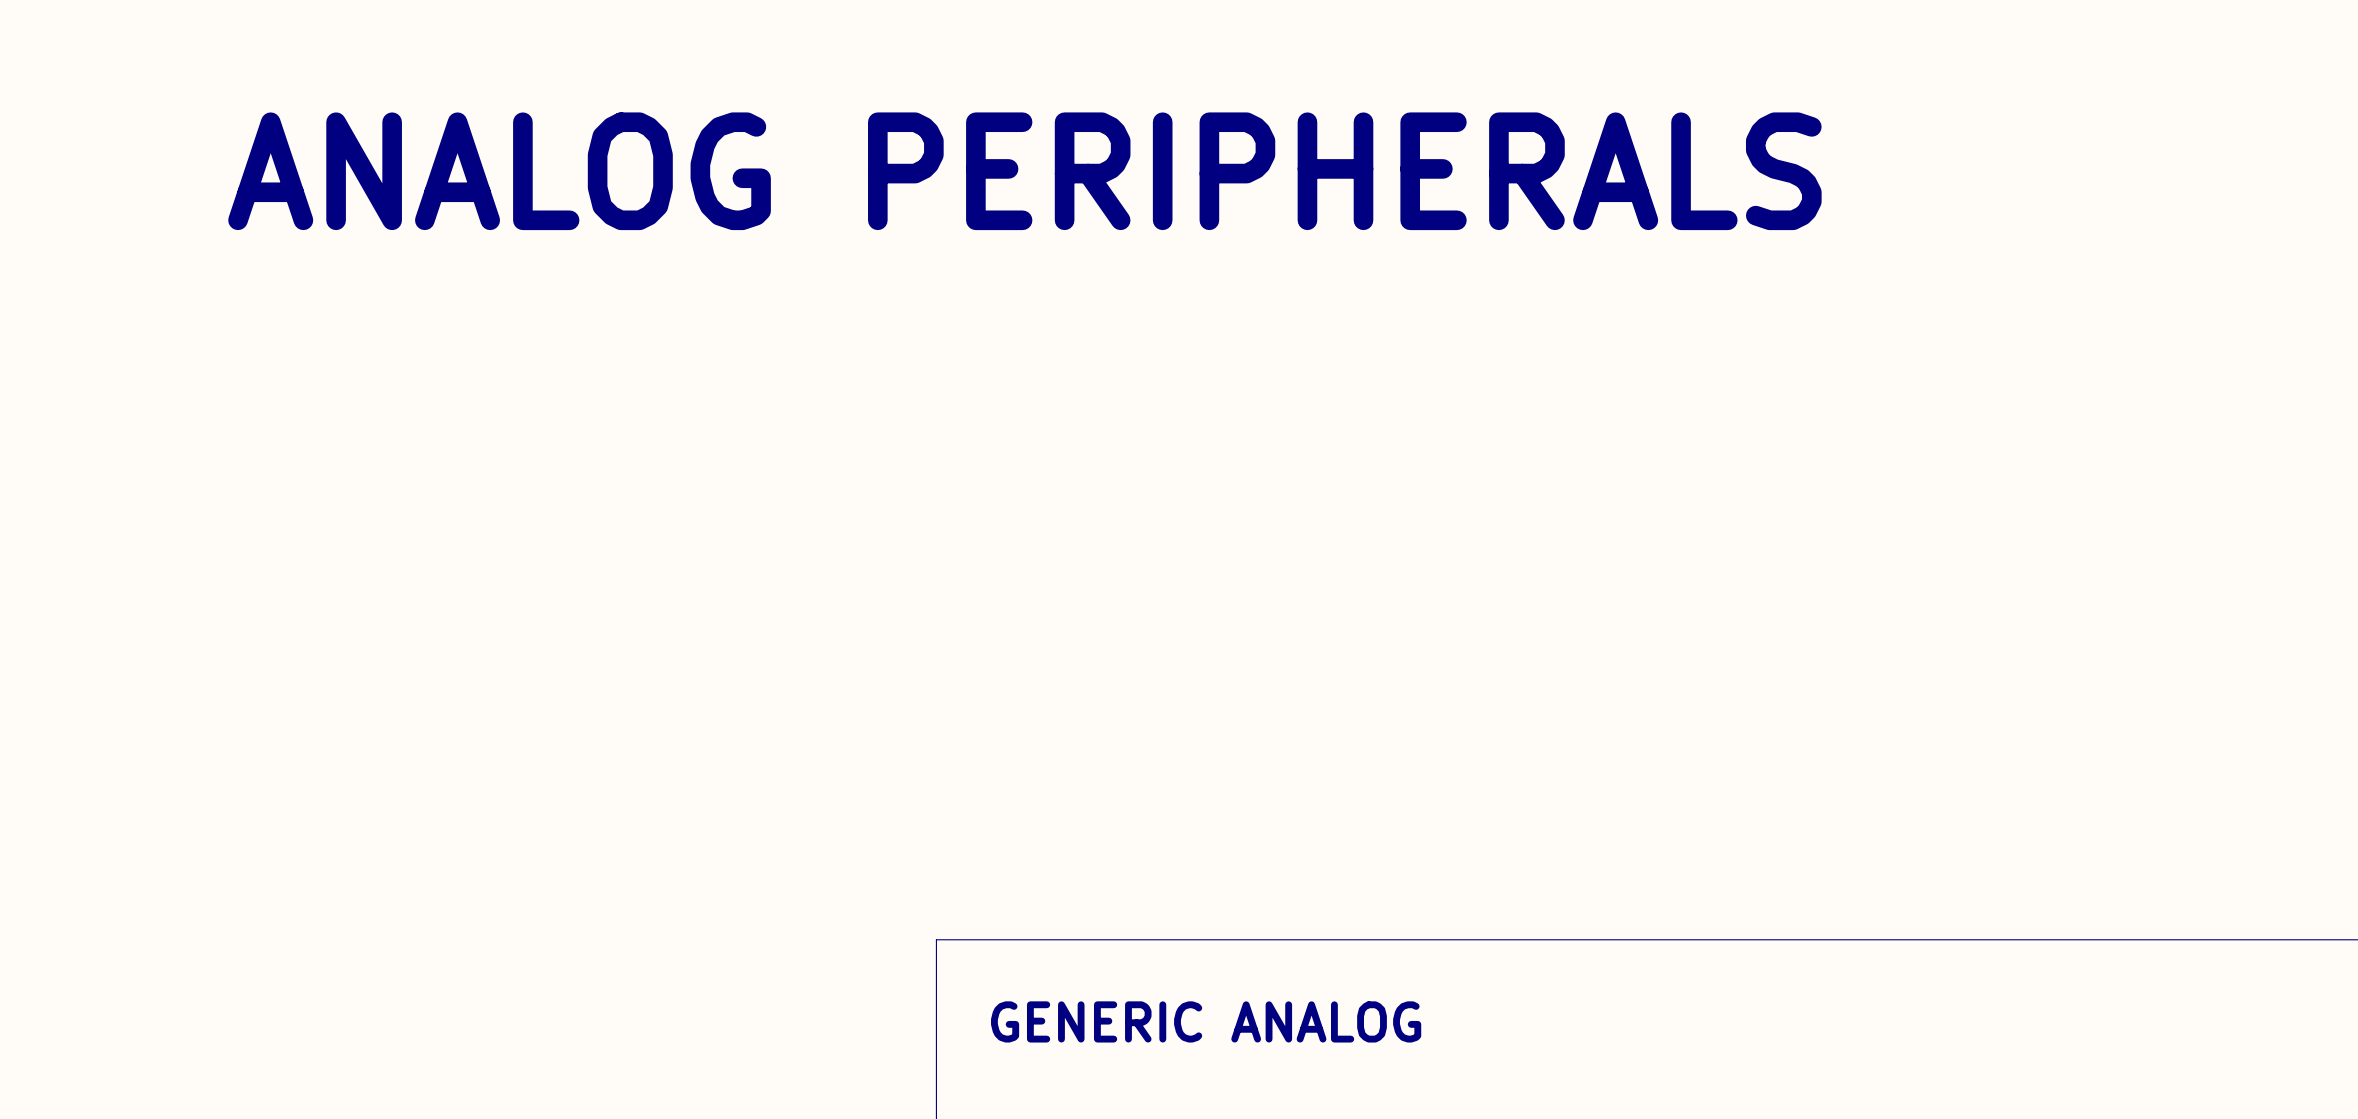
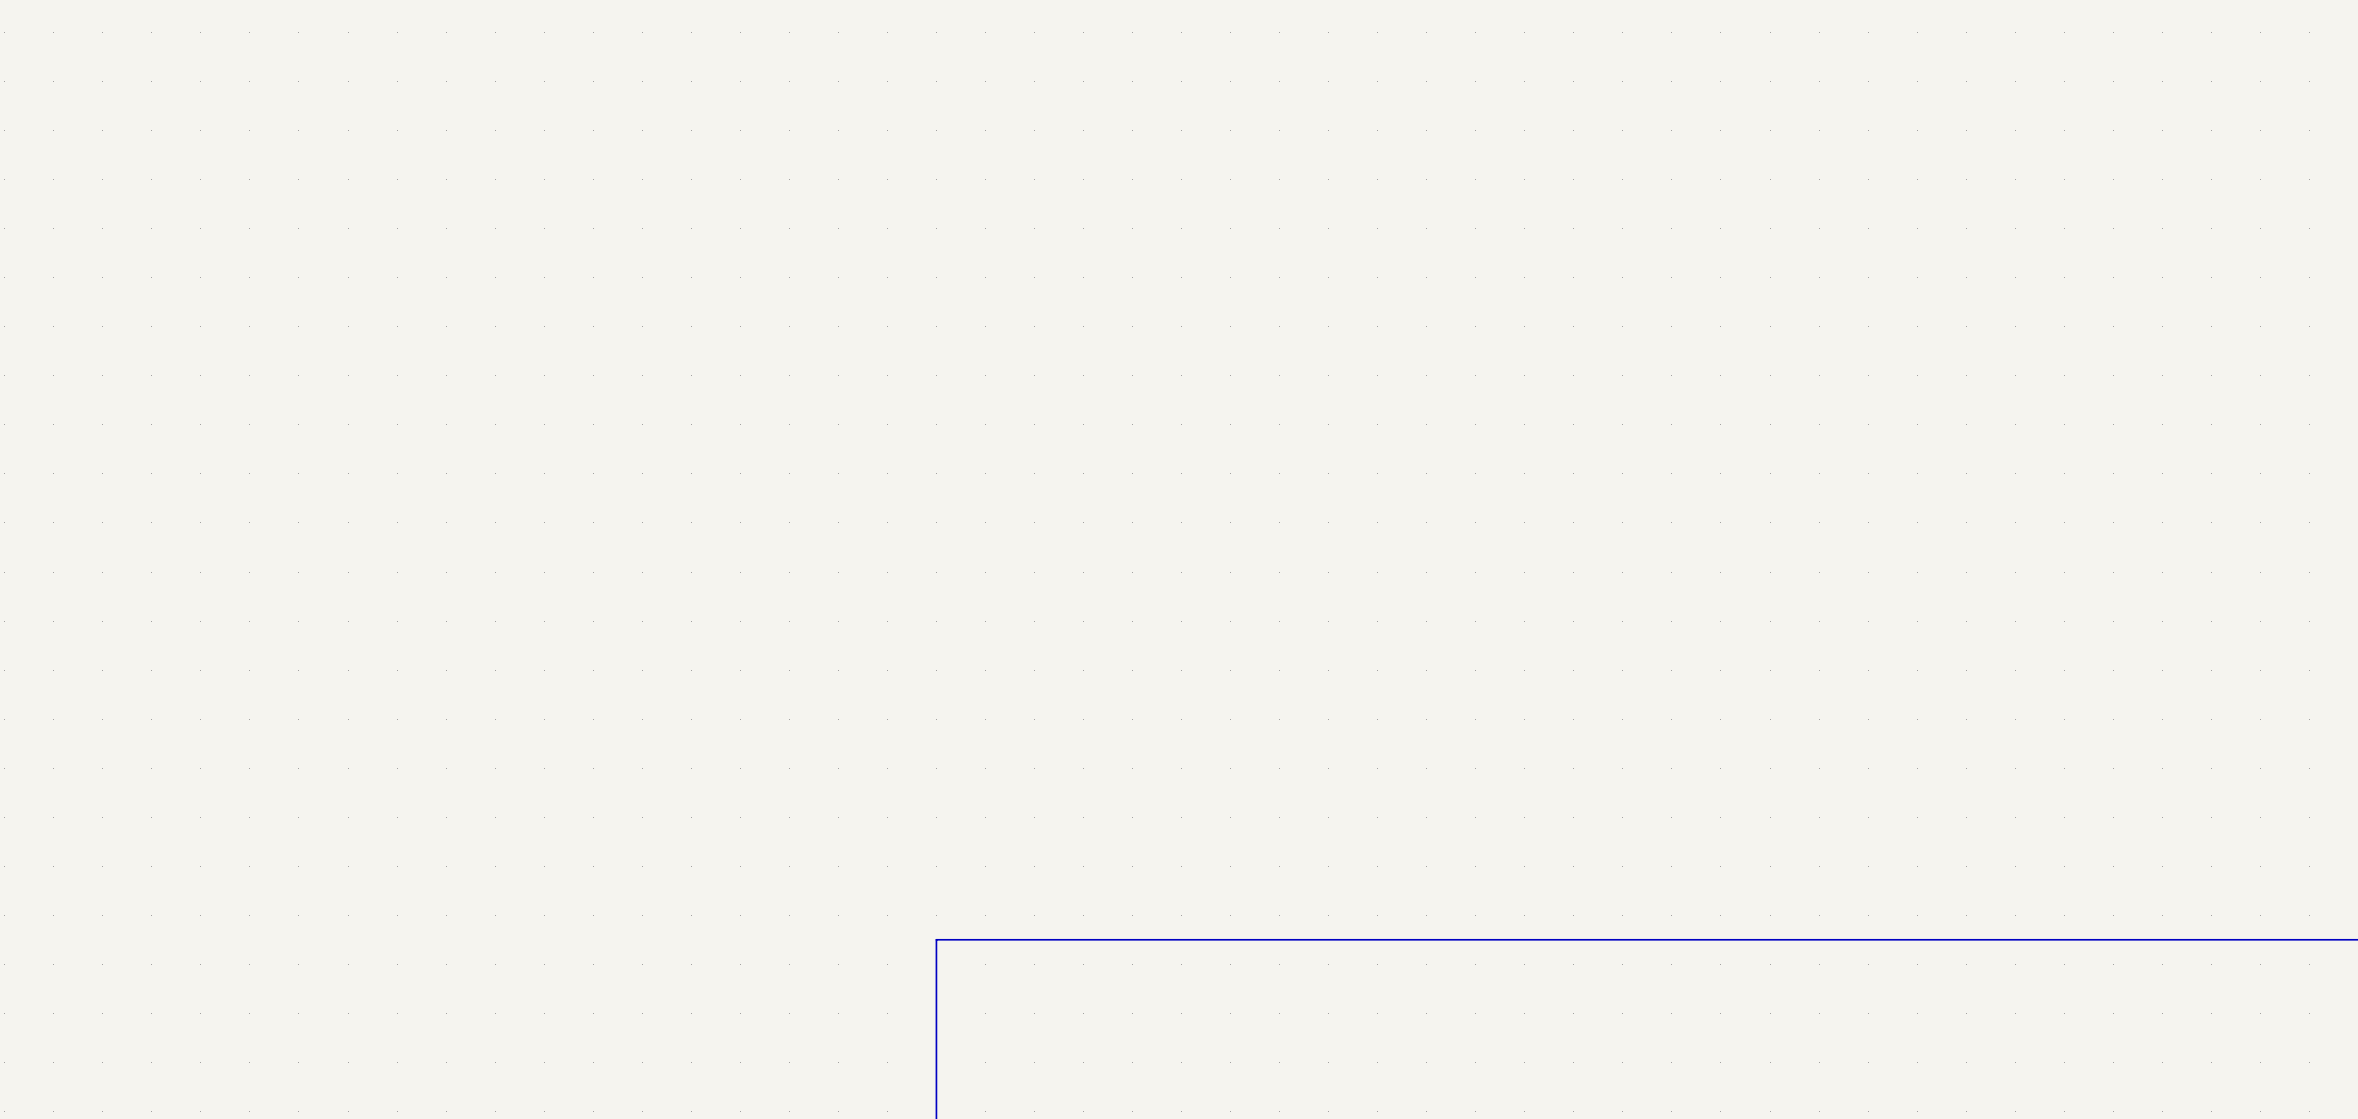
text: ANALOG PERIPHERALS (1024, 171) -> none
text: GENERIC ANALOG (1206, 1021) -> none

